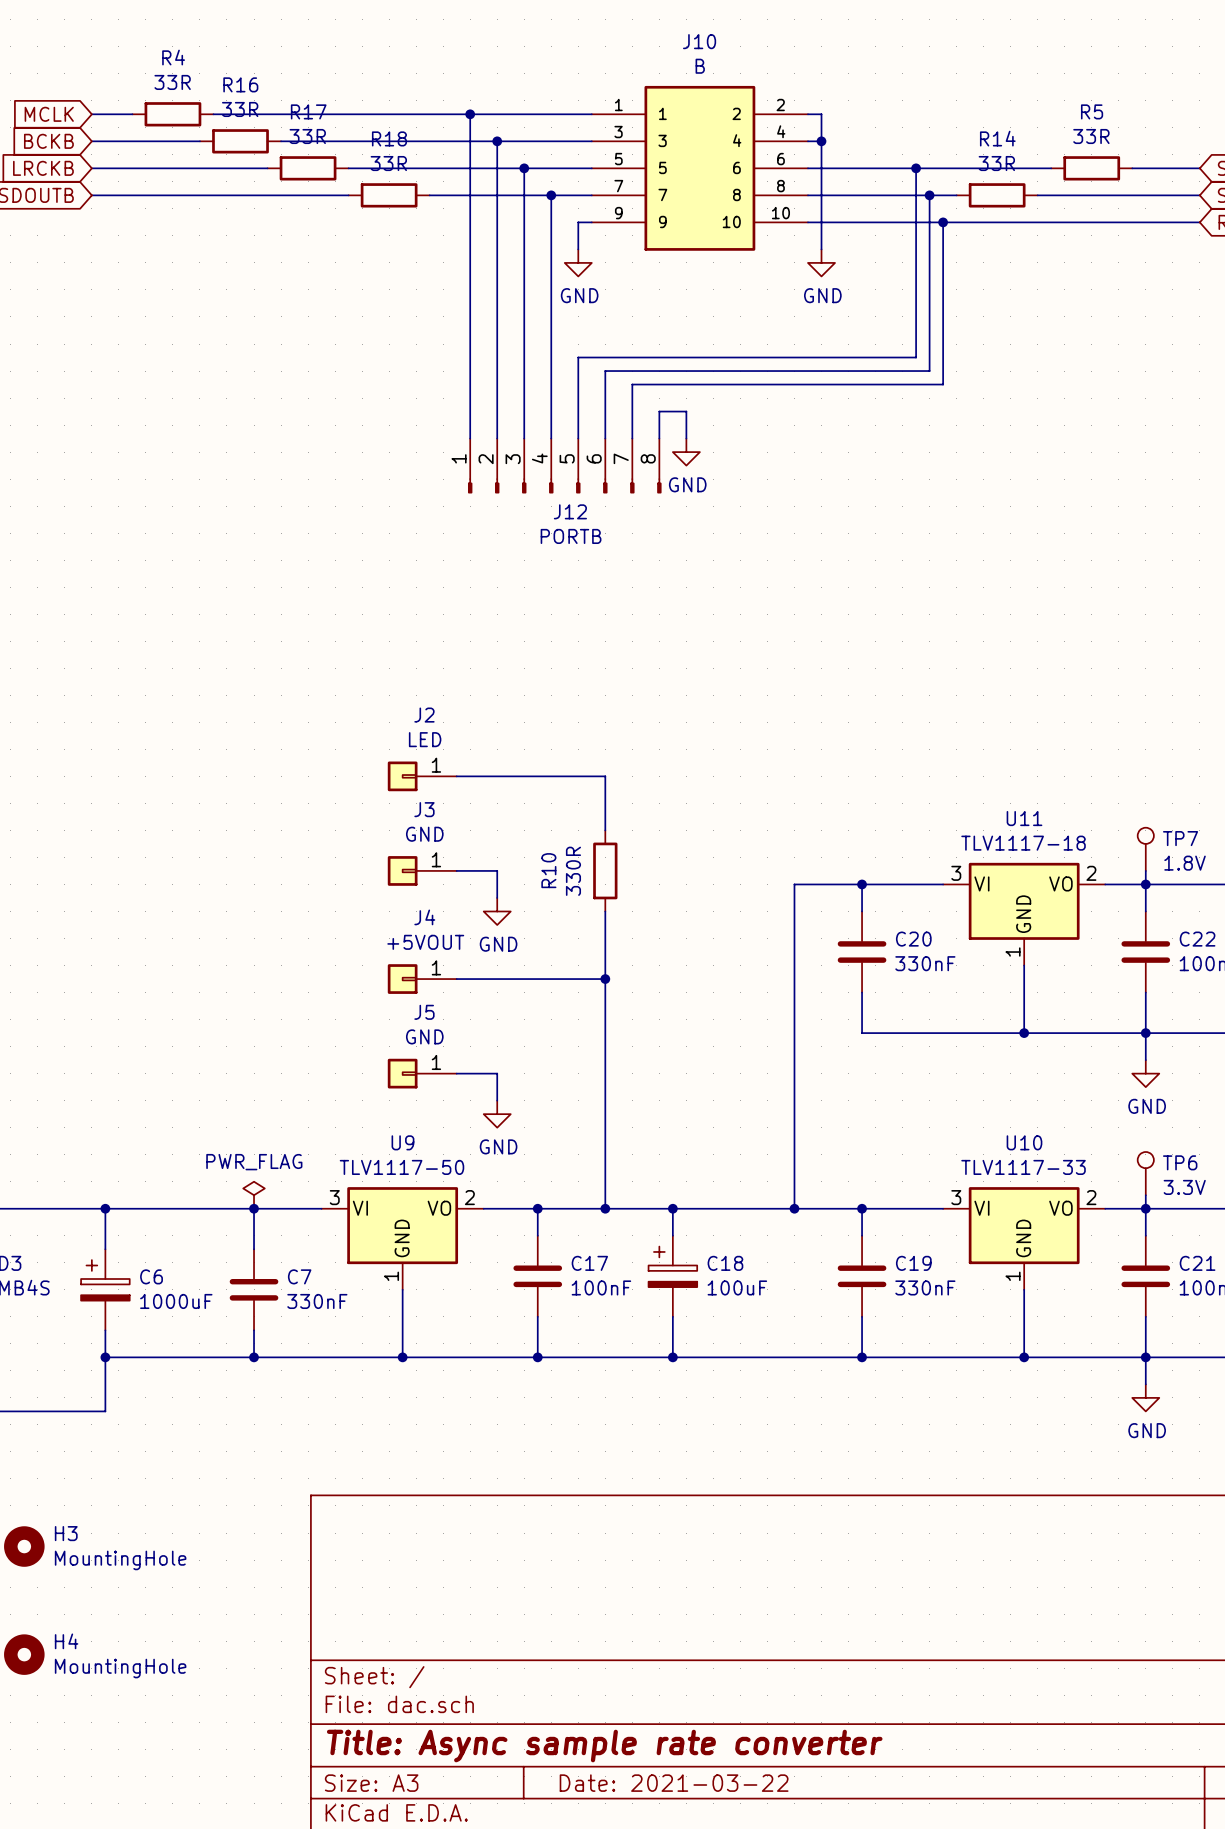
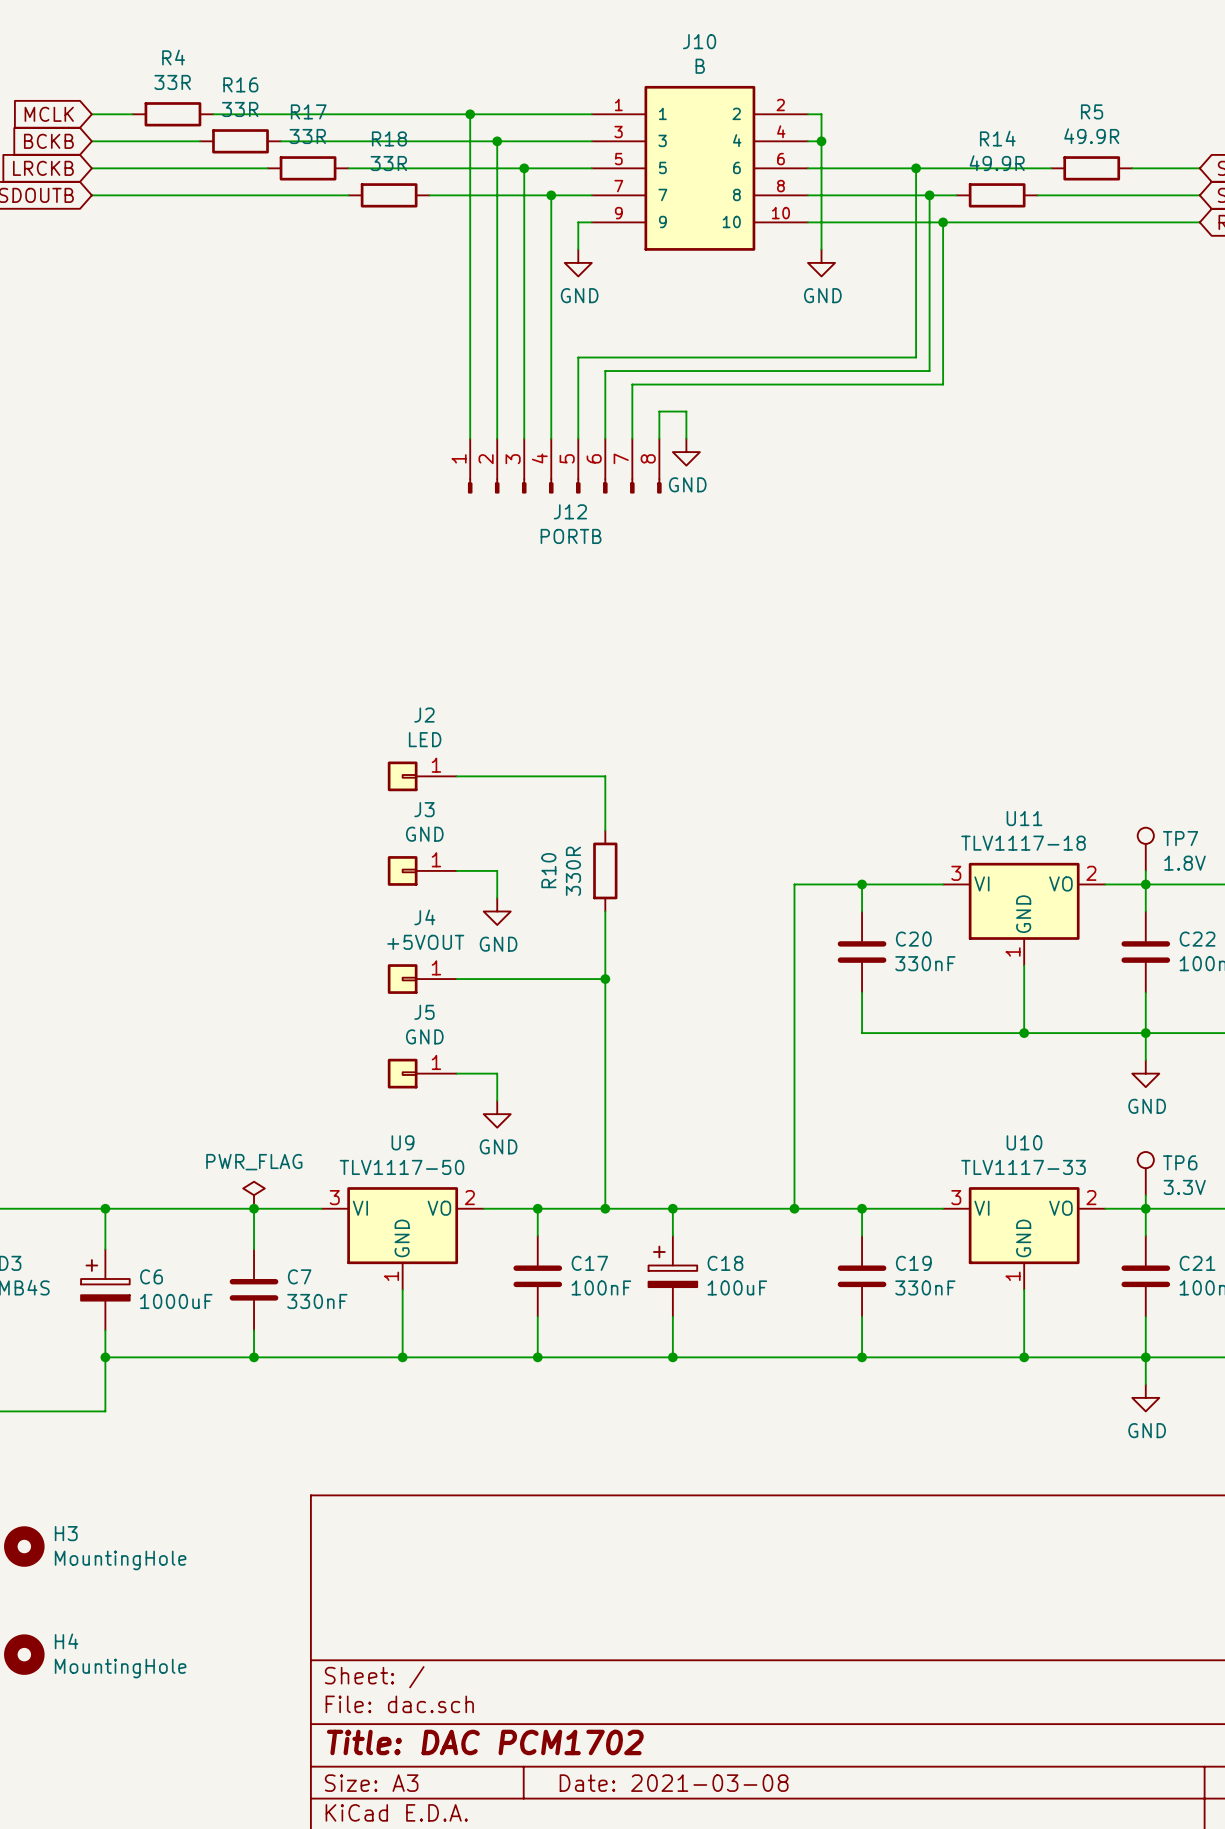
R5 value: 33R (1091, 136) -> 49.9R (1091, 136)
R14 value: 33R (996, 163) -> 49.9R (997, 163)
title block: Title: Async sample rate converter (604, 1746) -> Title: DAC PCM1702 (485, 1742)
title block: Date: 2021-03-22 (674, 1783) -> Date: 2021-03-08 (674, 1783)

